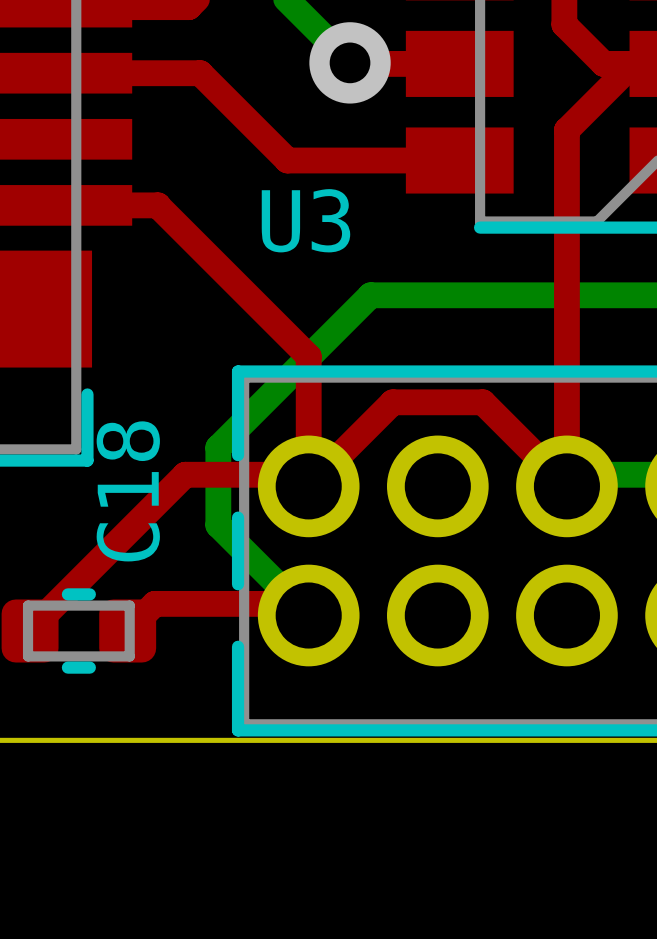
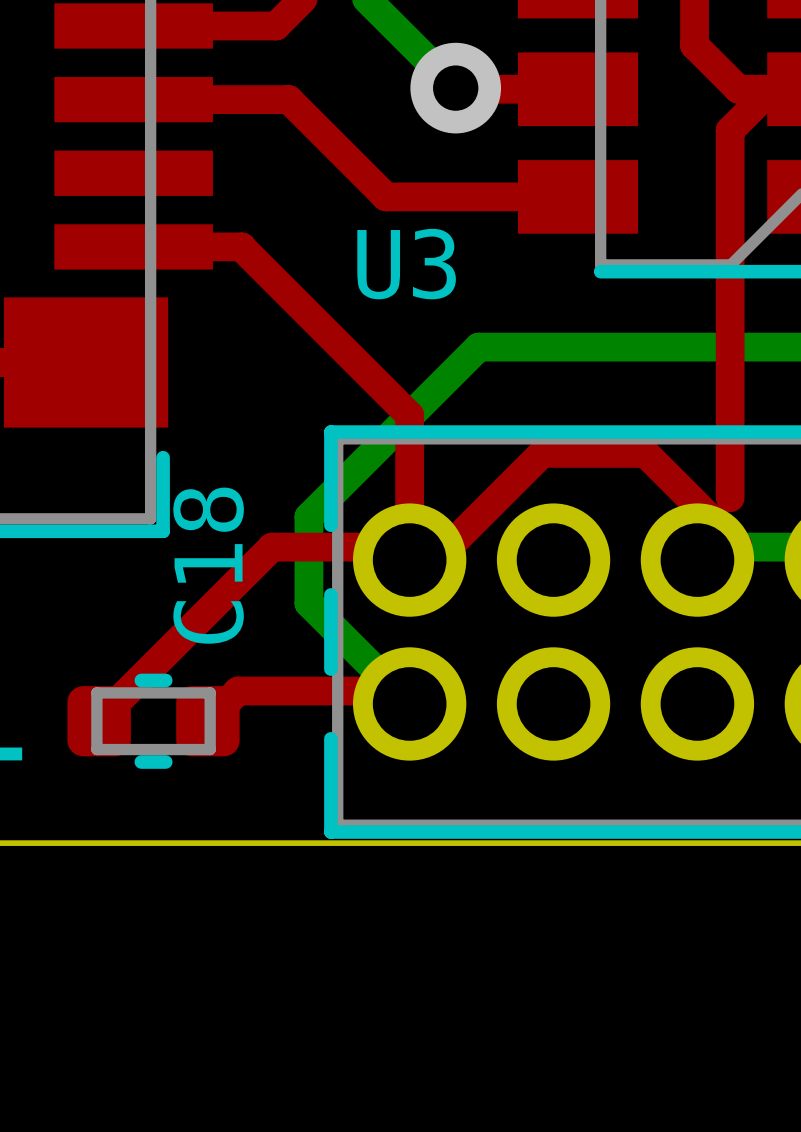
top track: (596, 100) (566, 130) (566, 486) (482, 402) (392, 402) (308, 486) -> (730, 130) (730, 497)
top track: none -> (737, 545) (645, 453) (542, 453) (448, 547)

